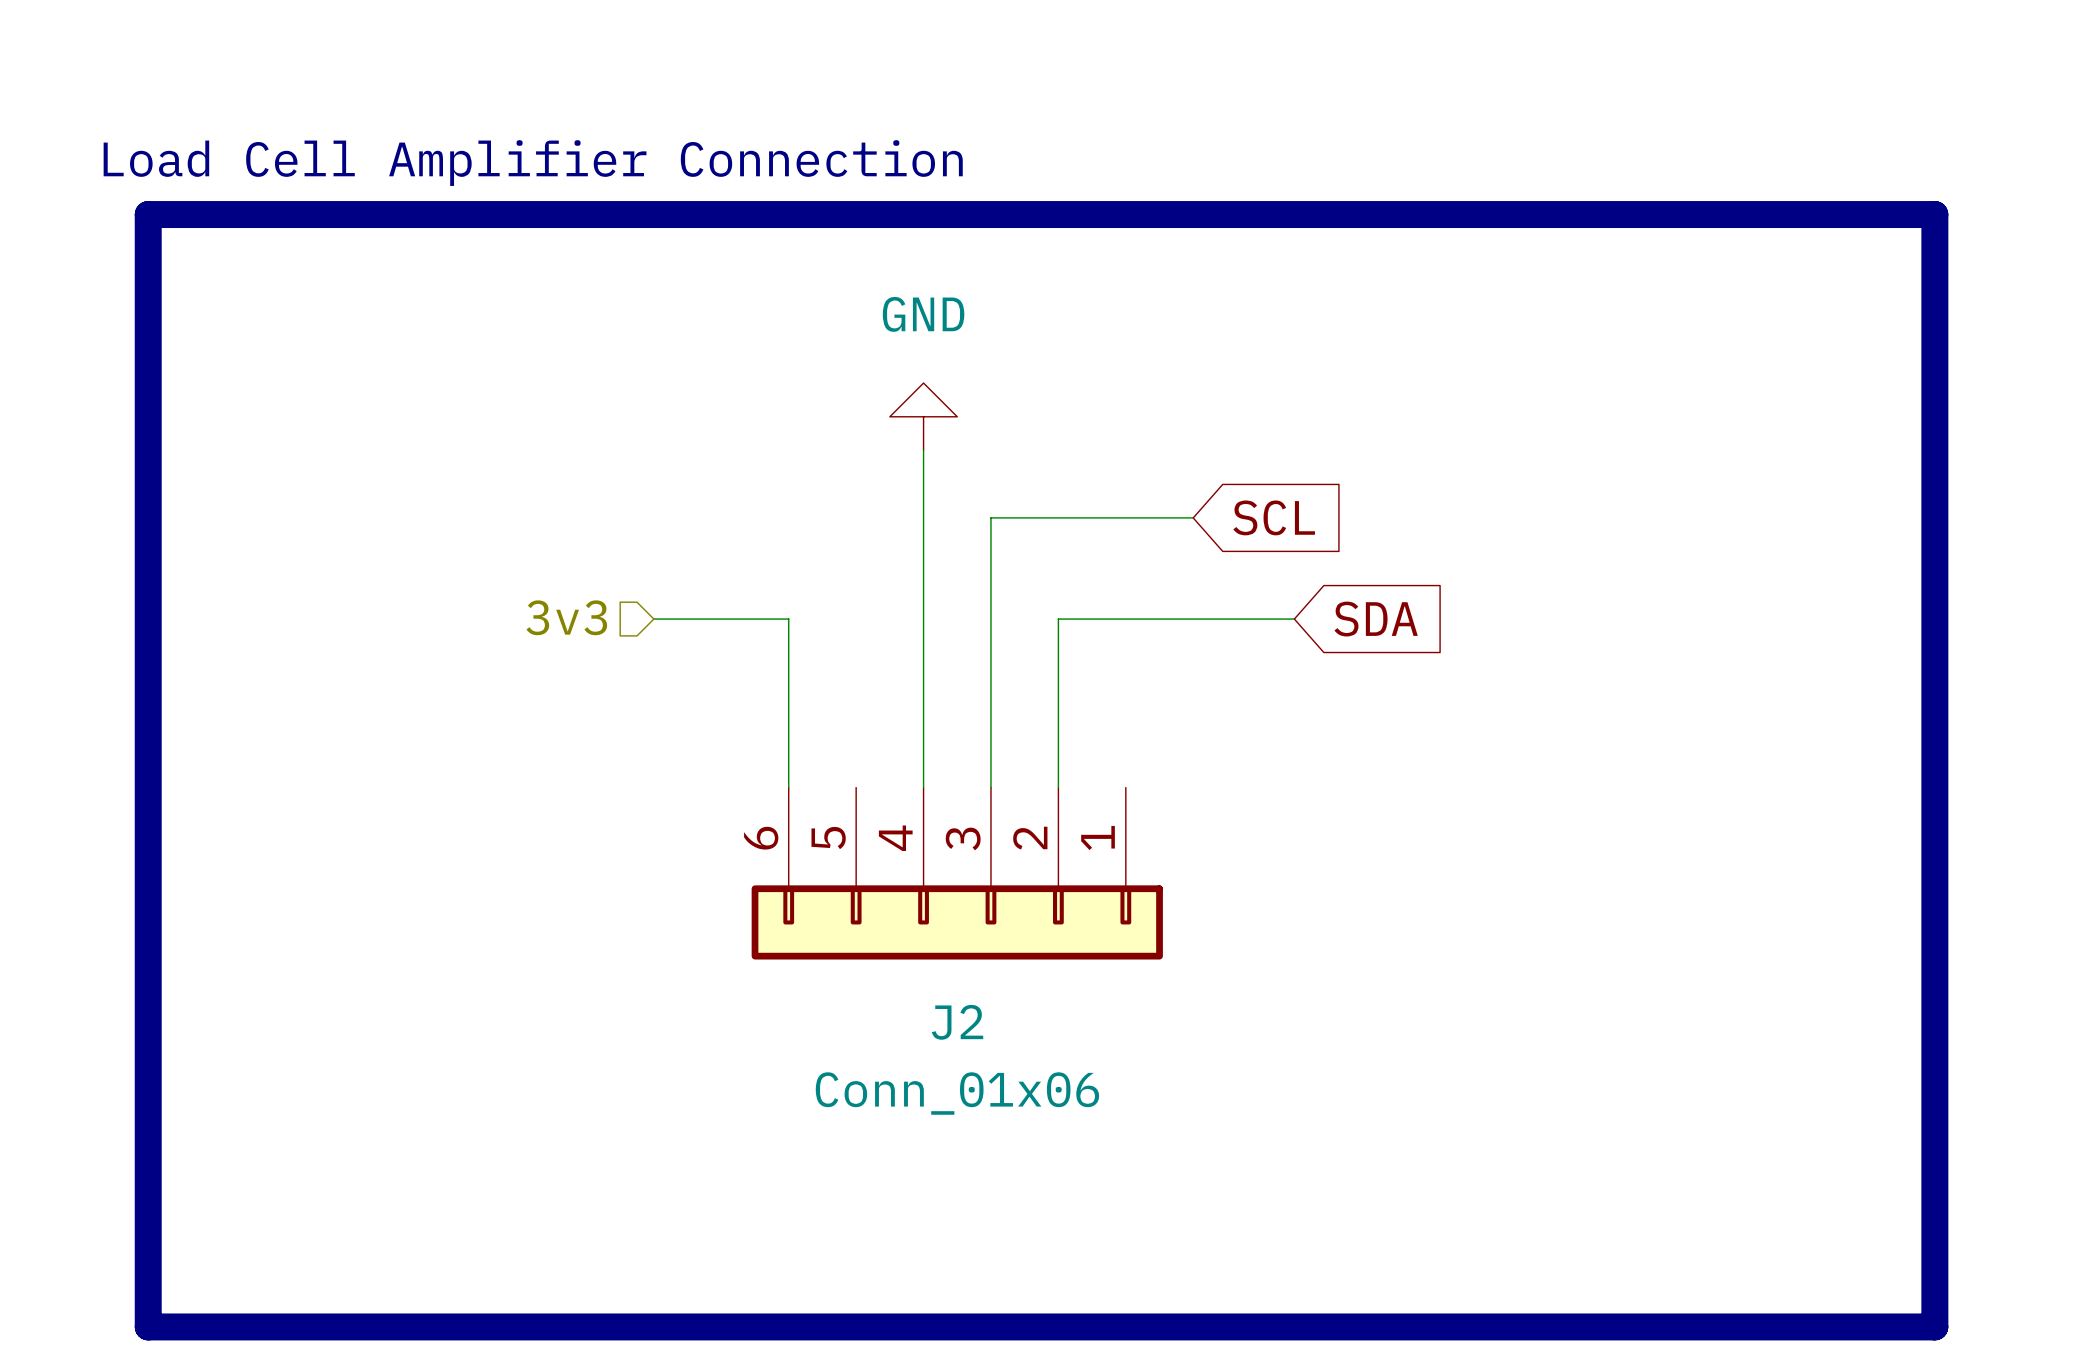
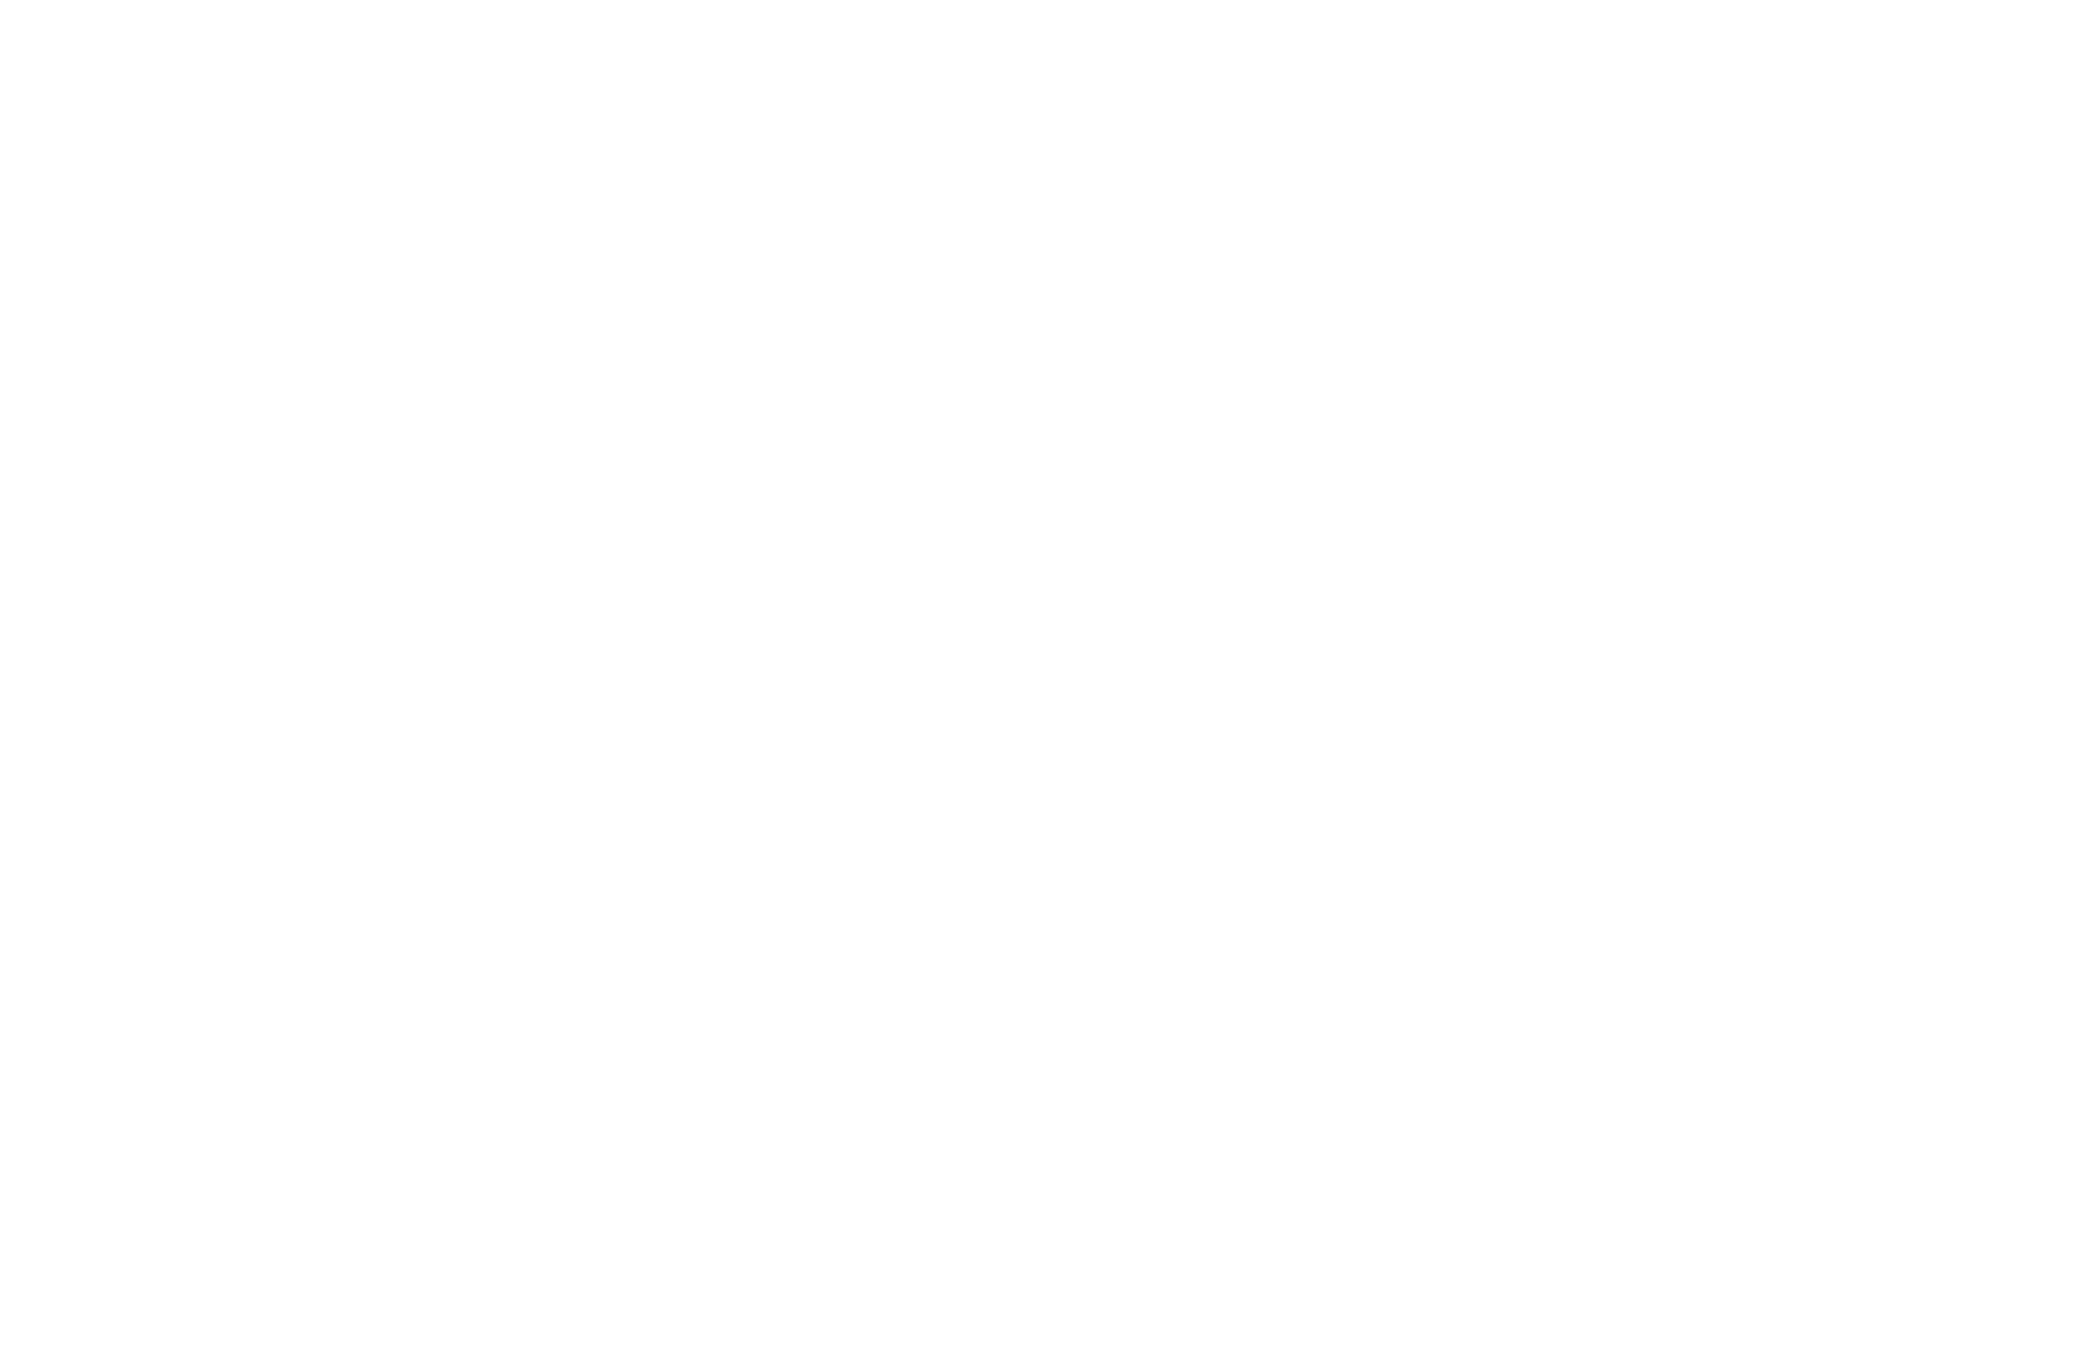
text: Load Cell Amplifier Connection (533, 163) -> none
line: (148, 214) (1934, 214) (1934, 1326) (148, 1326) (148, 214) -> none
power symbol: GND (923, 416) -> none
wire: (923, 450) (923, 787) -> none
wire: (1193, 517) (990, 517) (990, 787) -> none
global label: SCL (1274, 517) -> none
hierarchical label: 3v3 (566, 617) -> none
wire: (653, 619) (788, 619) (788, 787) -> none
wire: (1294, 619) (1058, 619) (1058, 787) -> none
global label: SDA (1376, 619) -> none
J2: Conn_01x06 (957, 873) -> none

